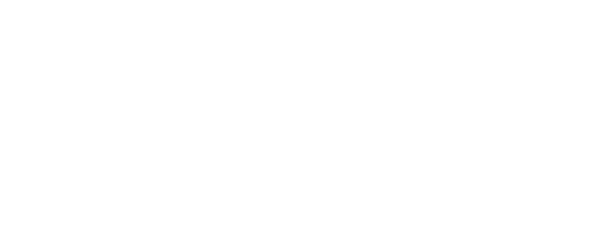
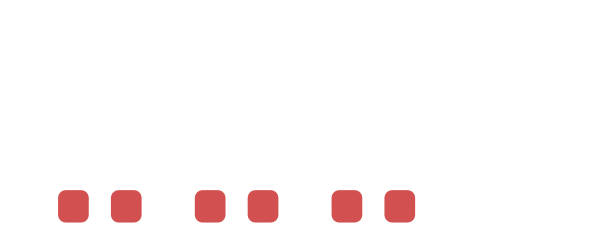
part: none -> (99, 206)
part: none -> (236, 206)
part: none -> (373, 206)

